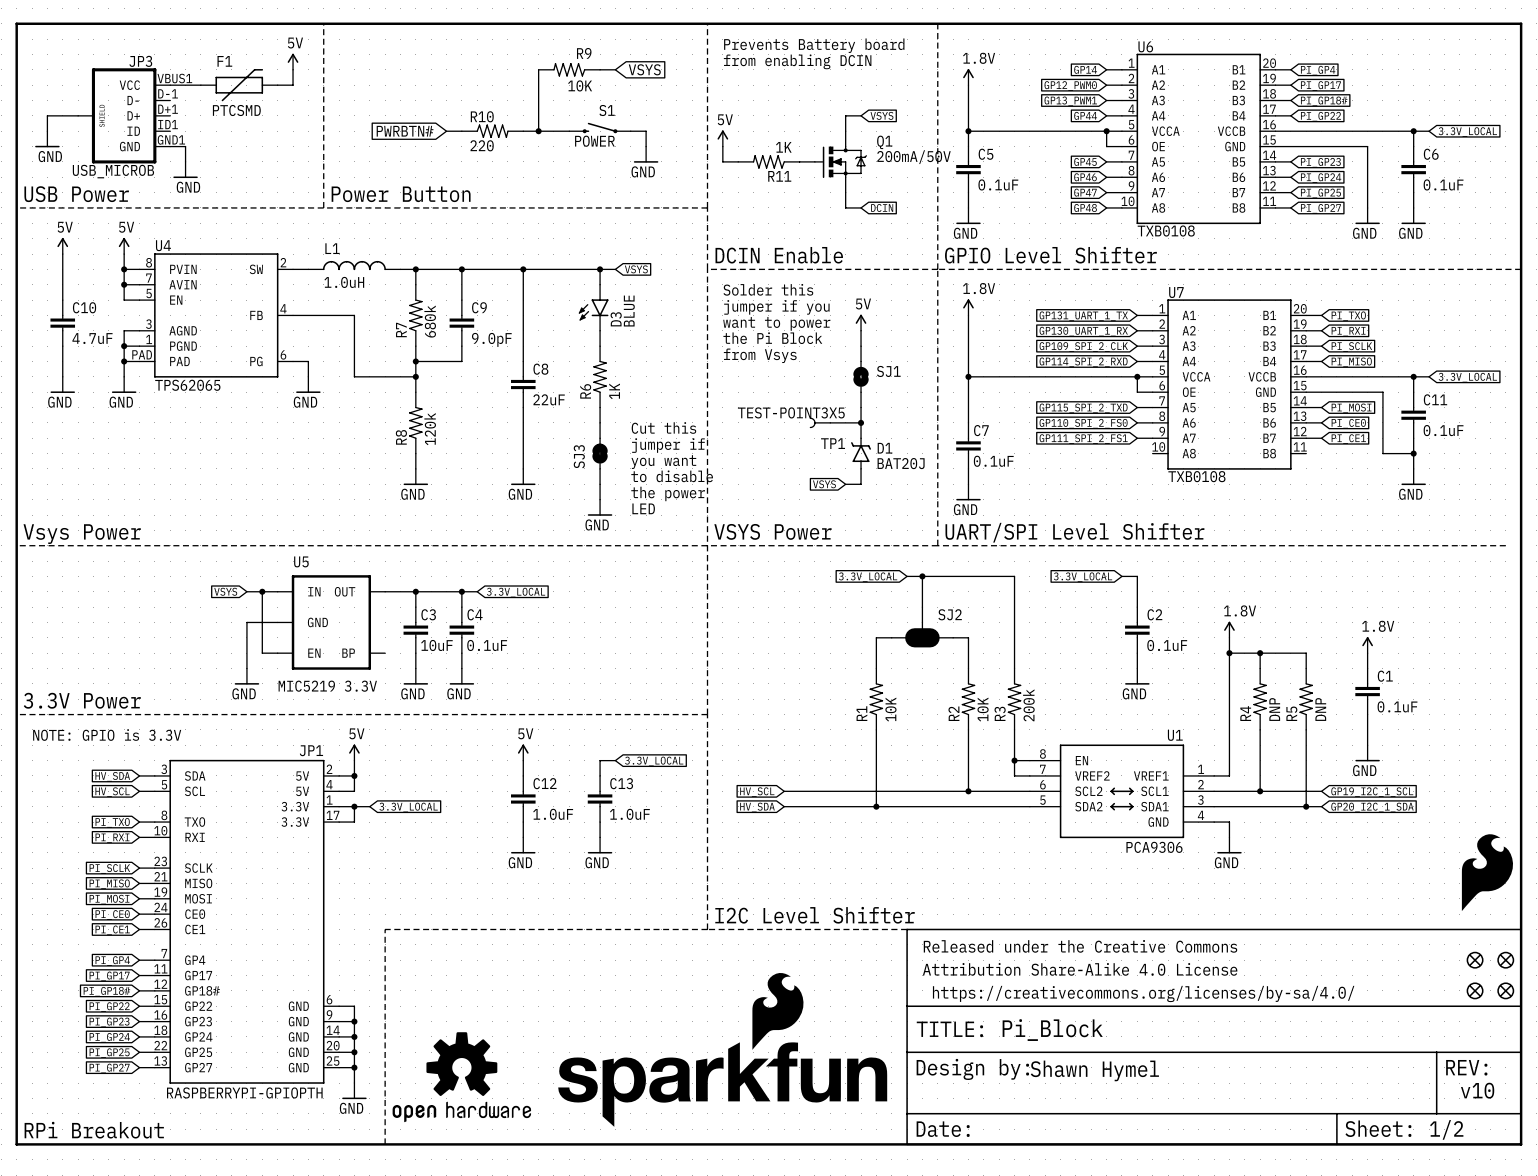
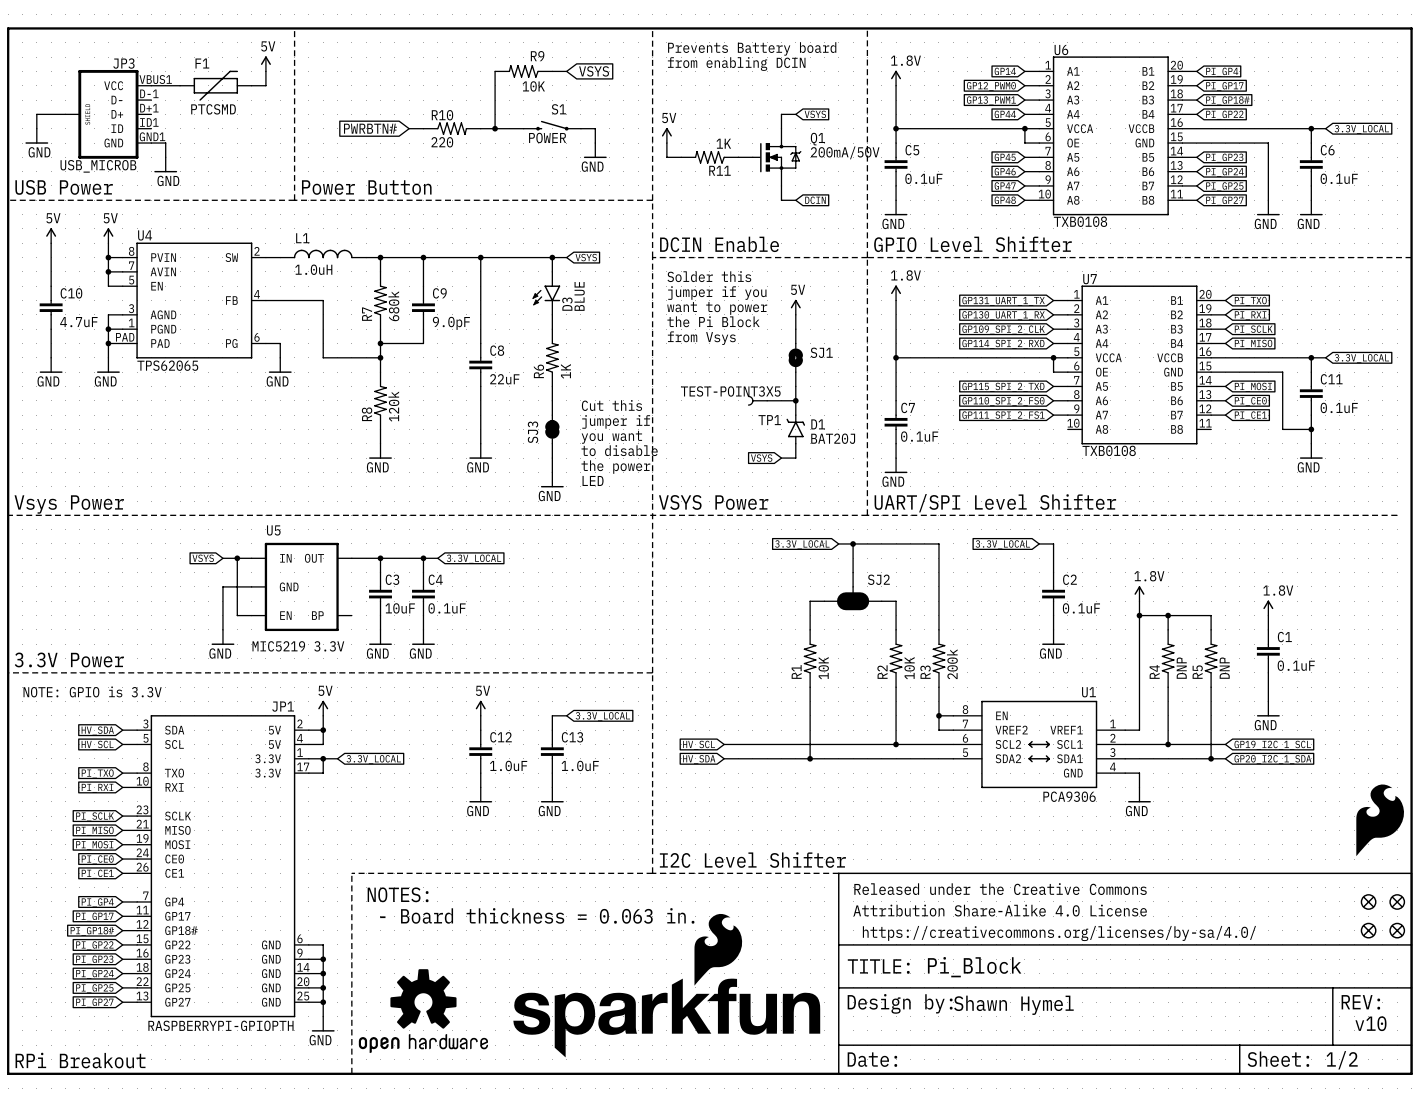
text: none -> NOTES: (398, 894)
text: none -> - Board thickness = 0.063 in. (537, 915)

